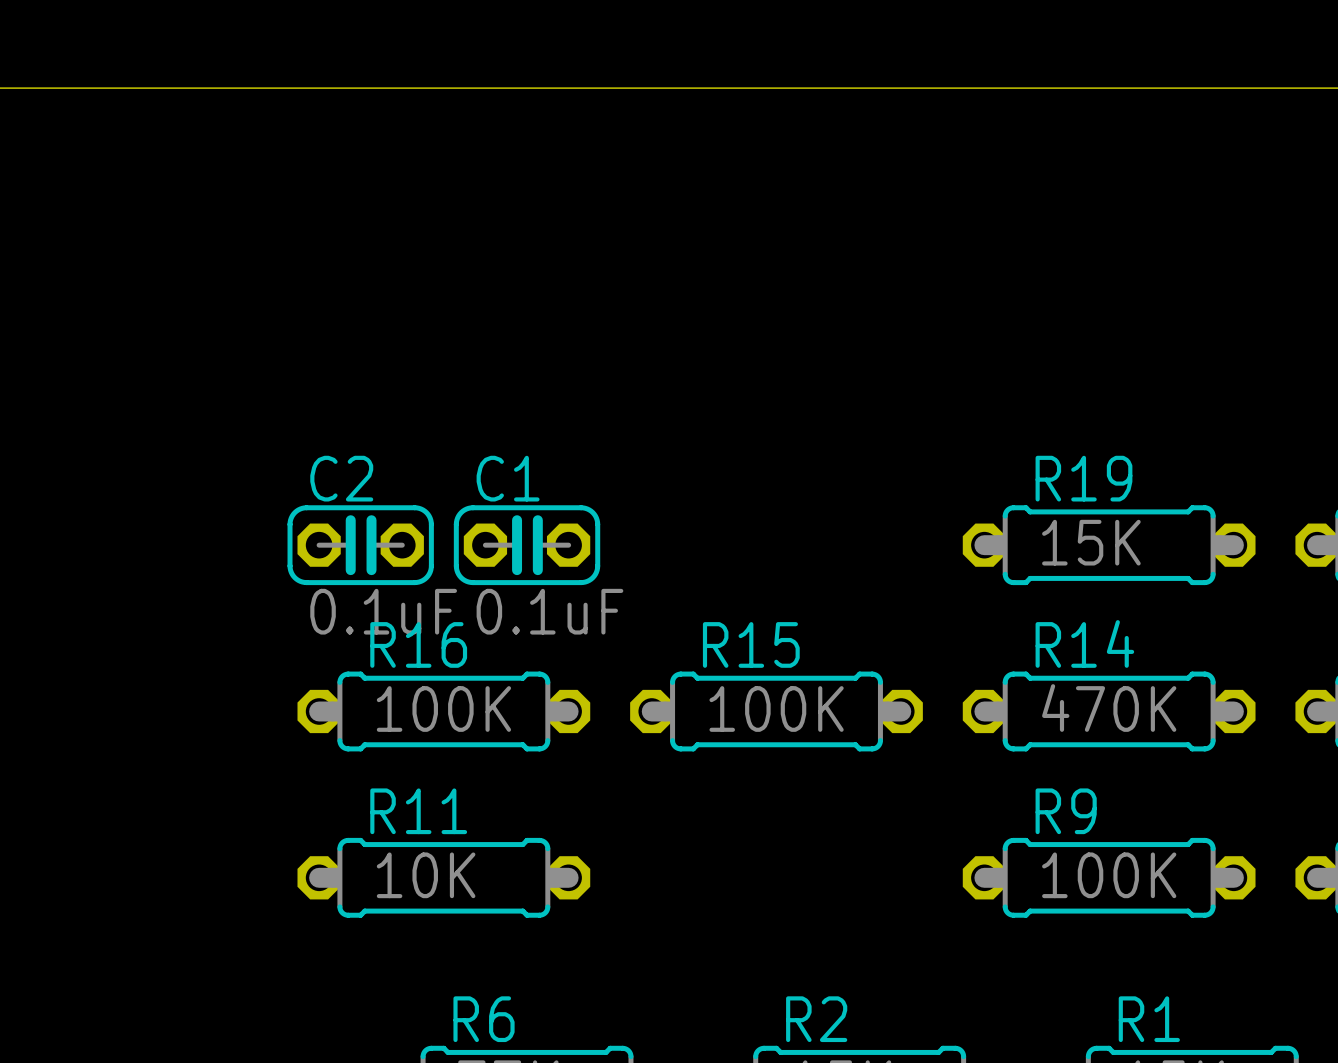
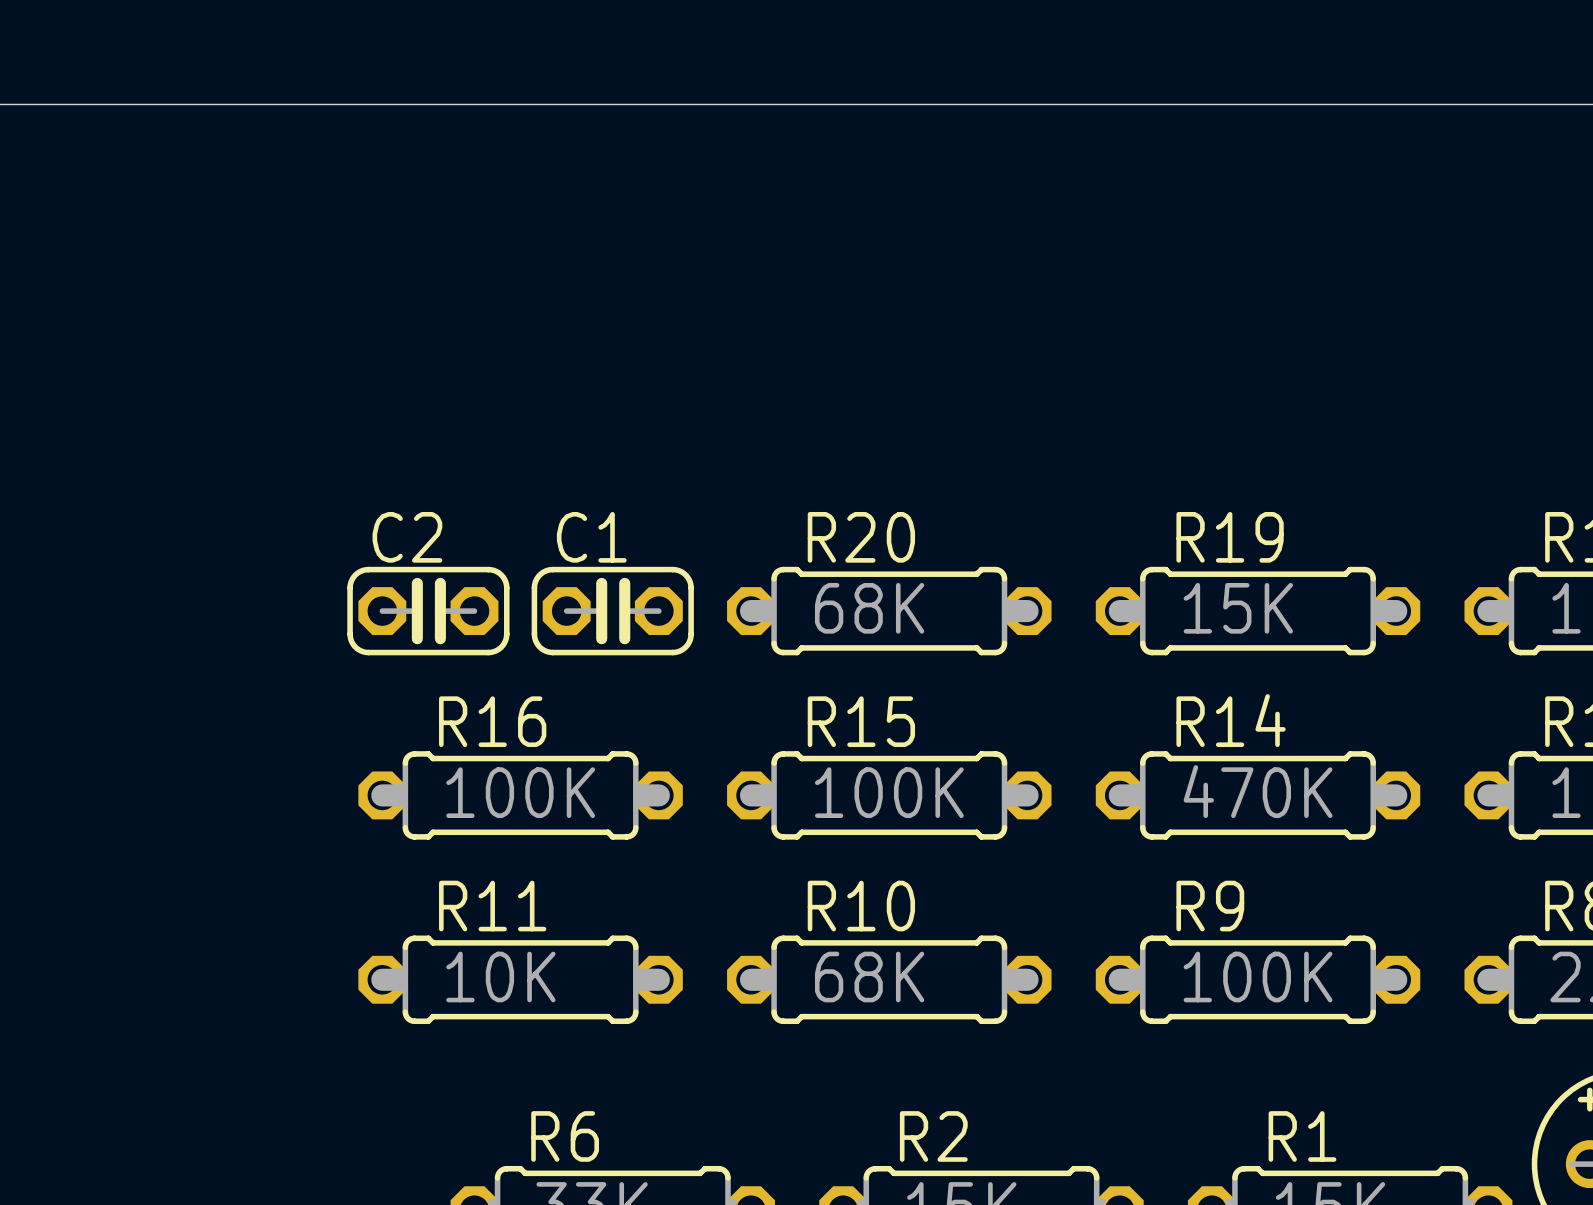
R20: none -> 68K (889, 611)
C2 value: 0.1uF (383, 611) -> none
C1 value: 0.1uF (549, 611) -> none
R10: none -> 68K (889, 979)

